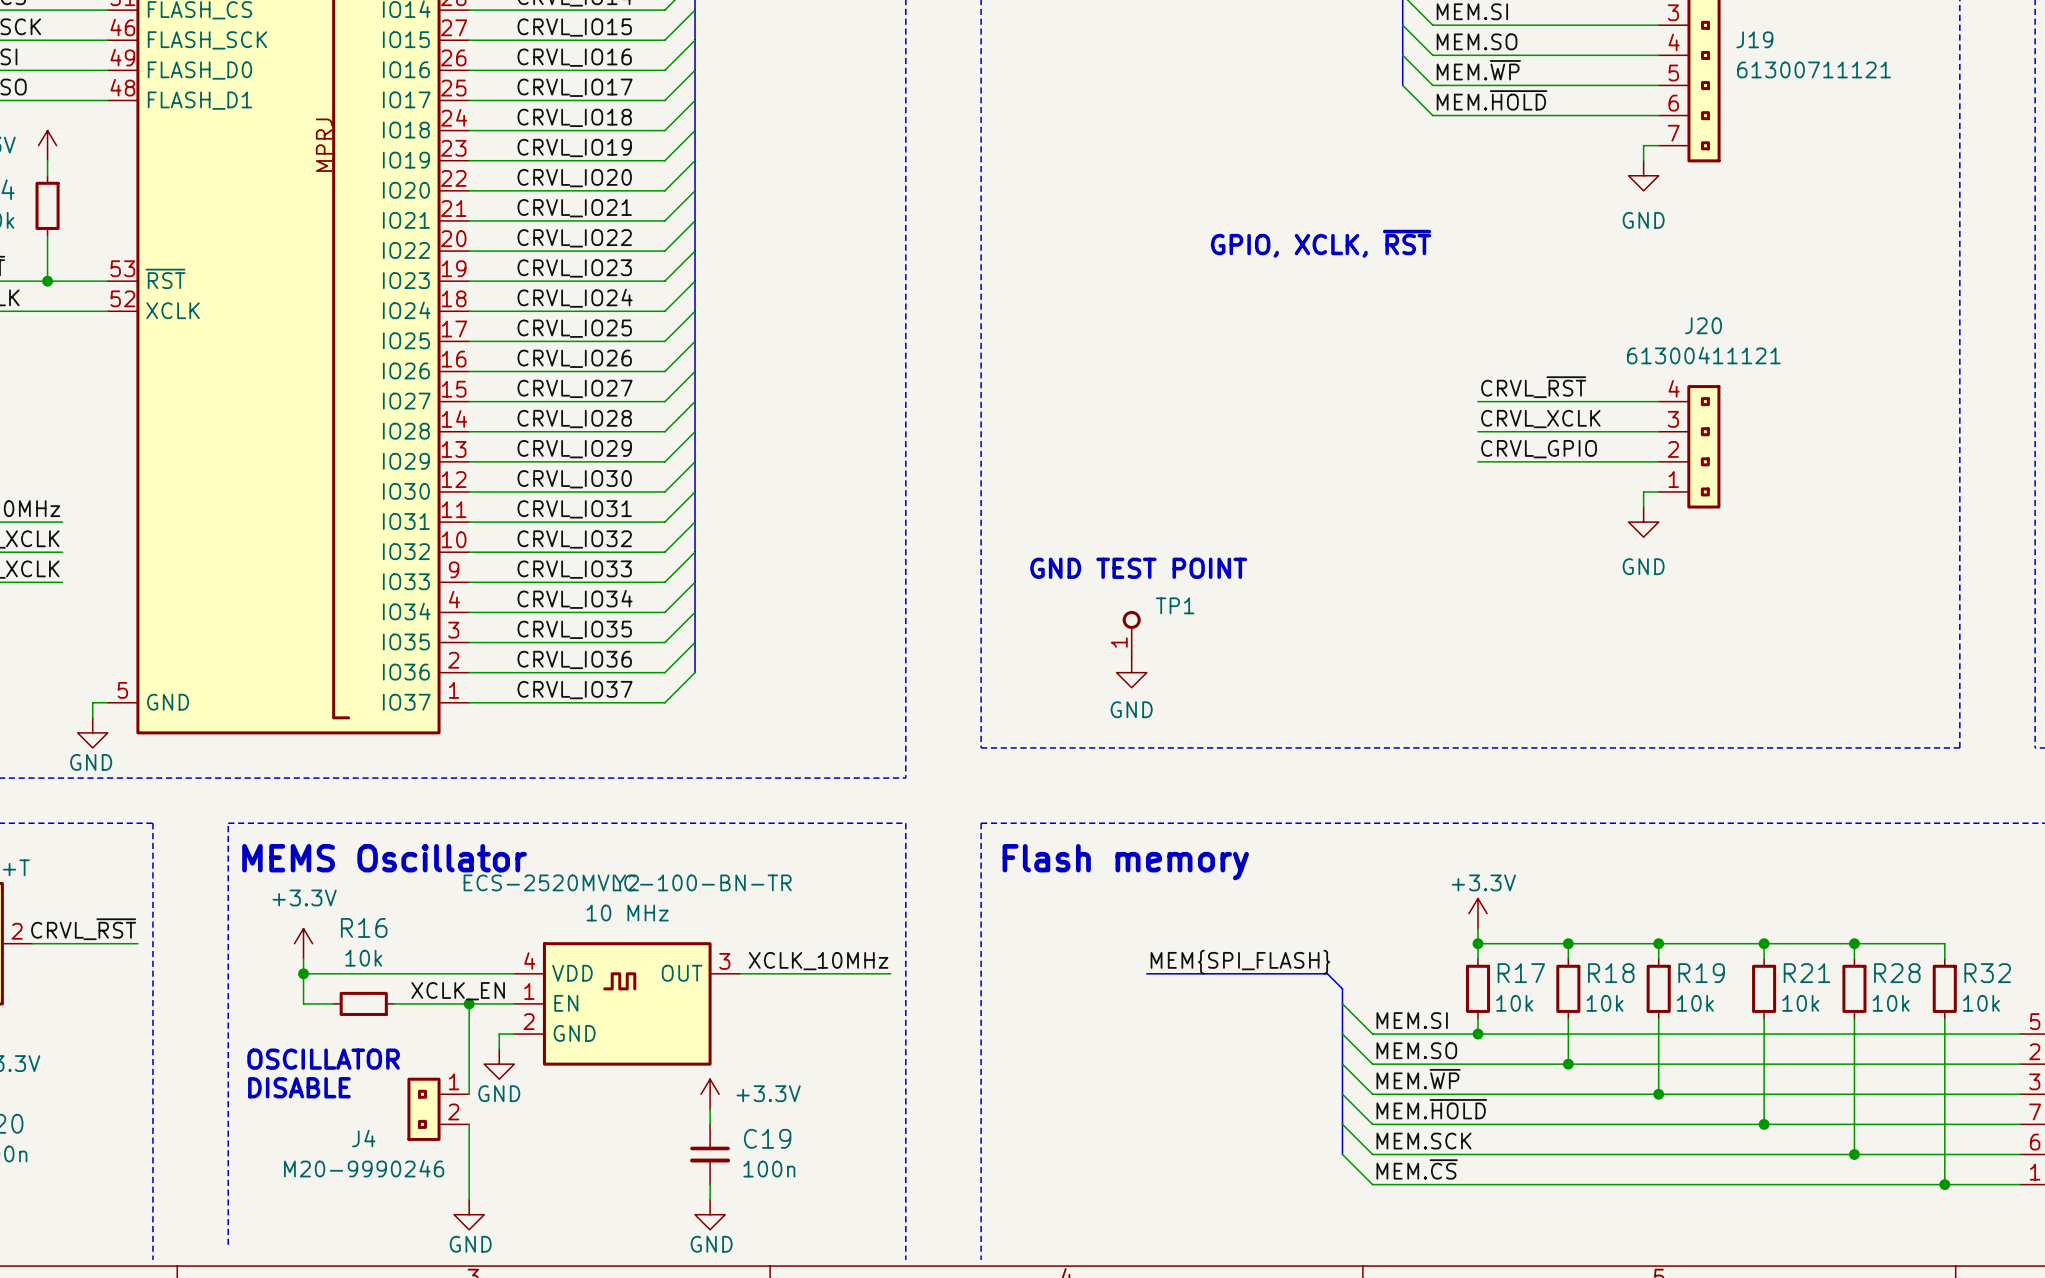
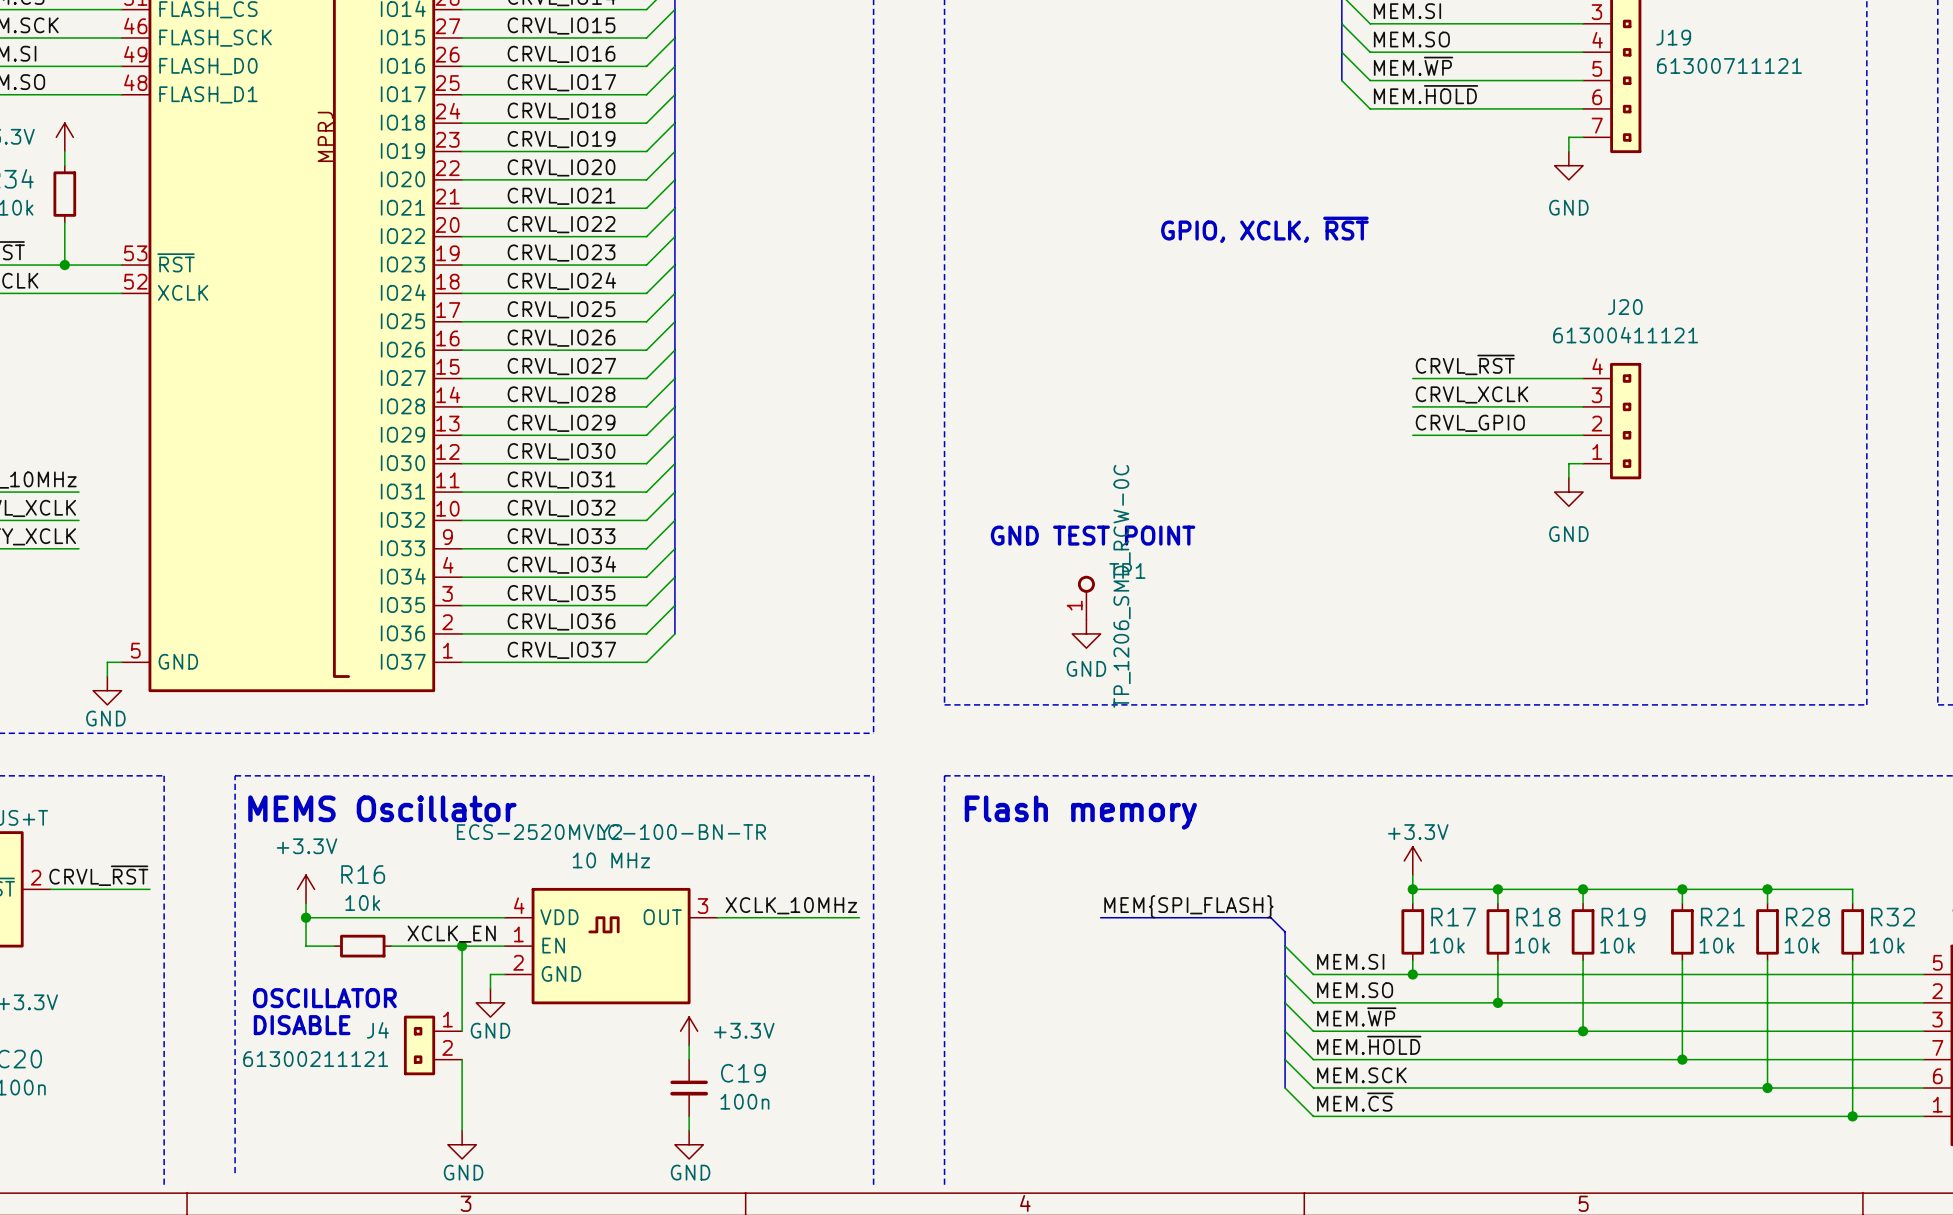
TP1 value: none -> TP_1206_SMD_RCW-0C (1122, 586)
J4 name position: J4 (363, 1138) -> J4 (377, 1030)
J4 text: M20-9990246 (364, 1168) -> 61300211121 (315, 1059)

